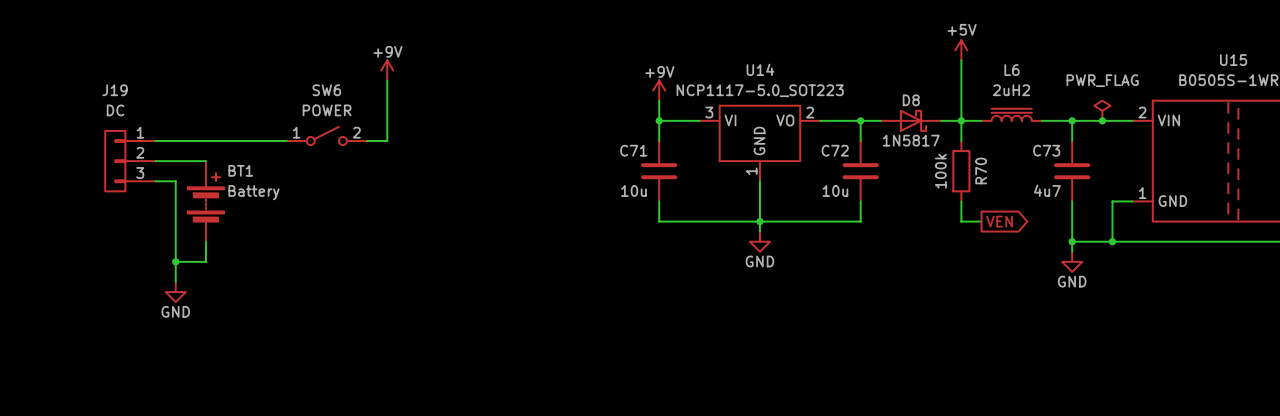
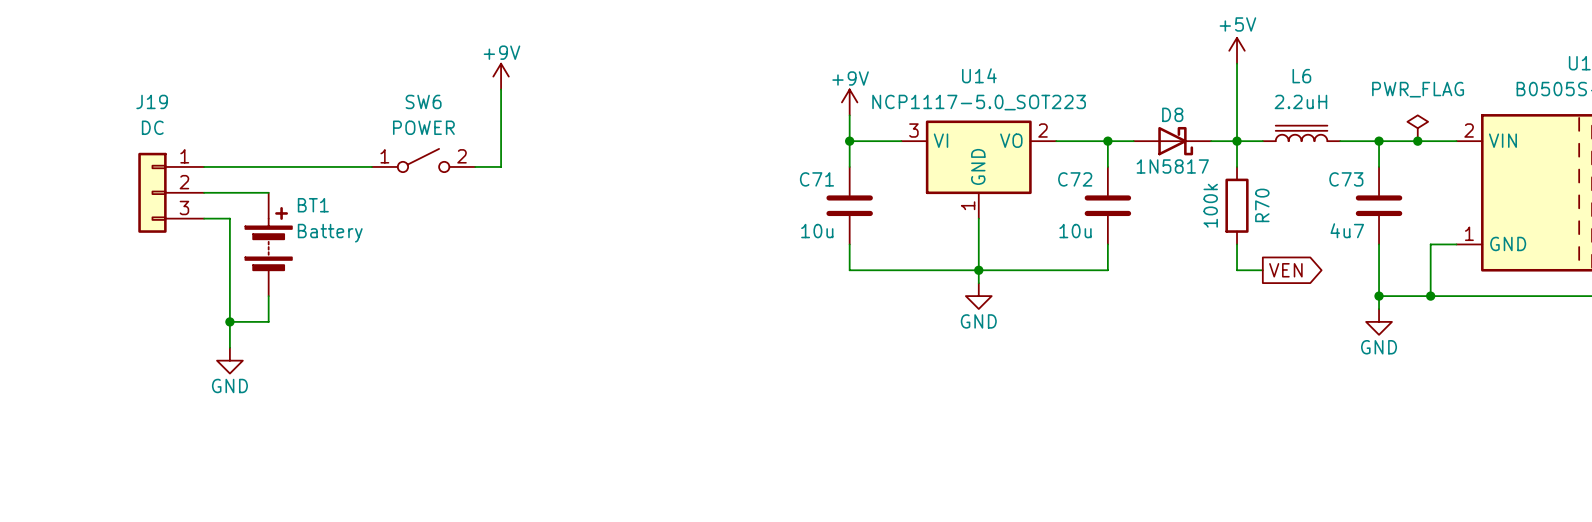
L6 value: 2uH2 (1011, 90) -> 2.2uH (1300, 101)

